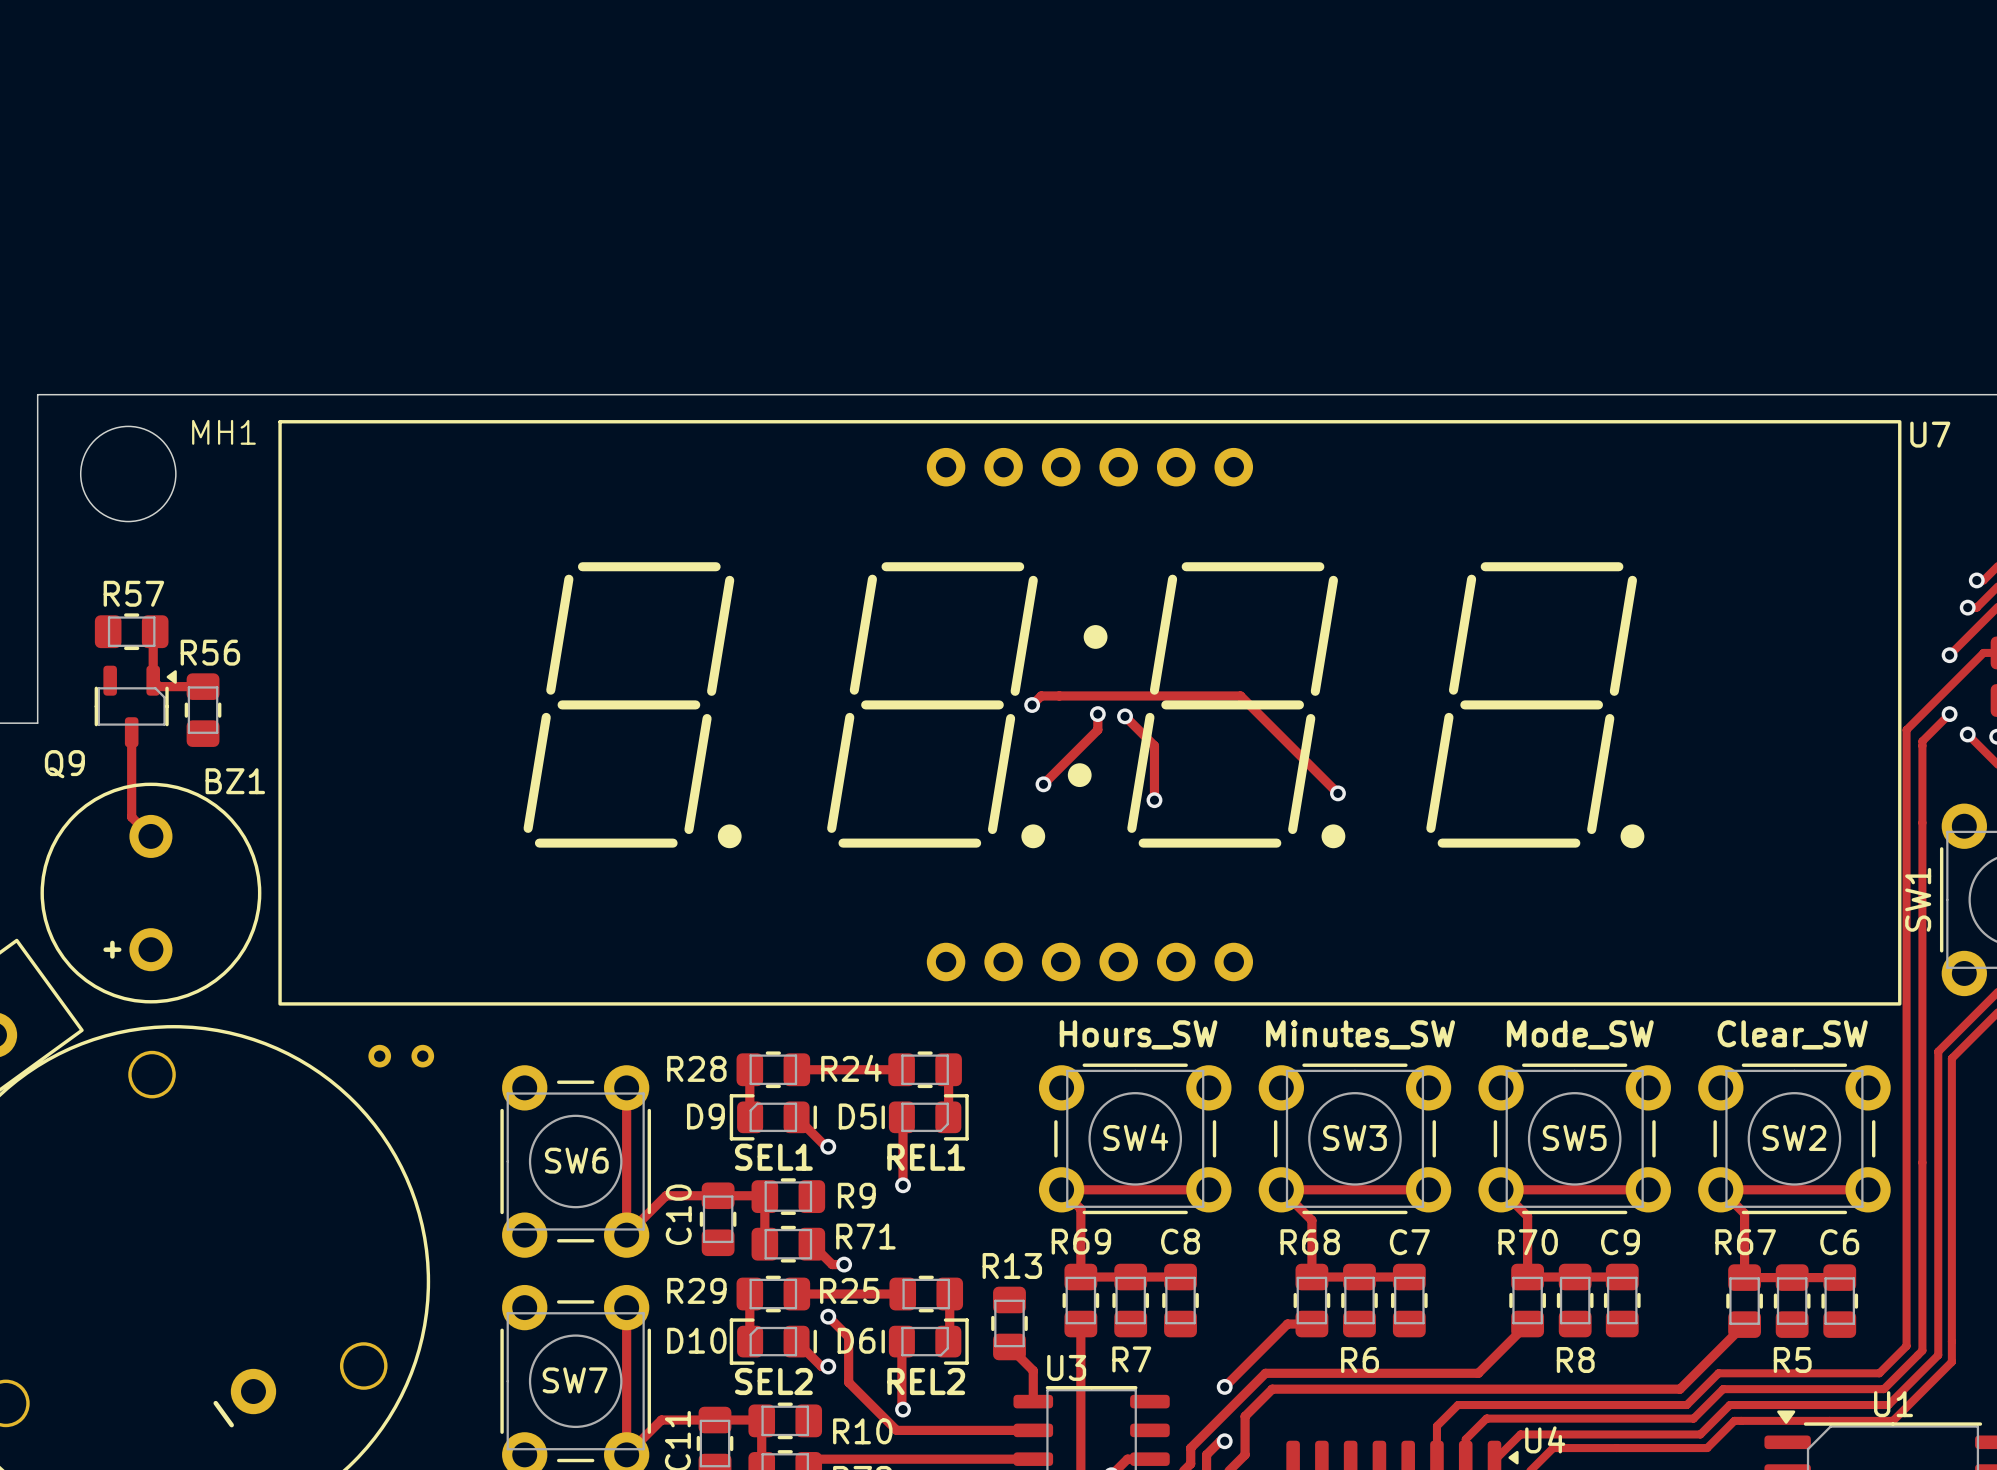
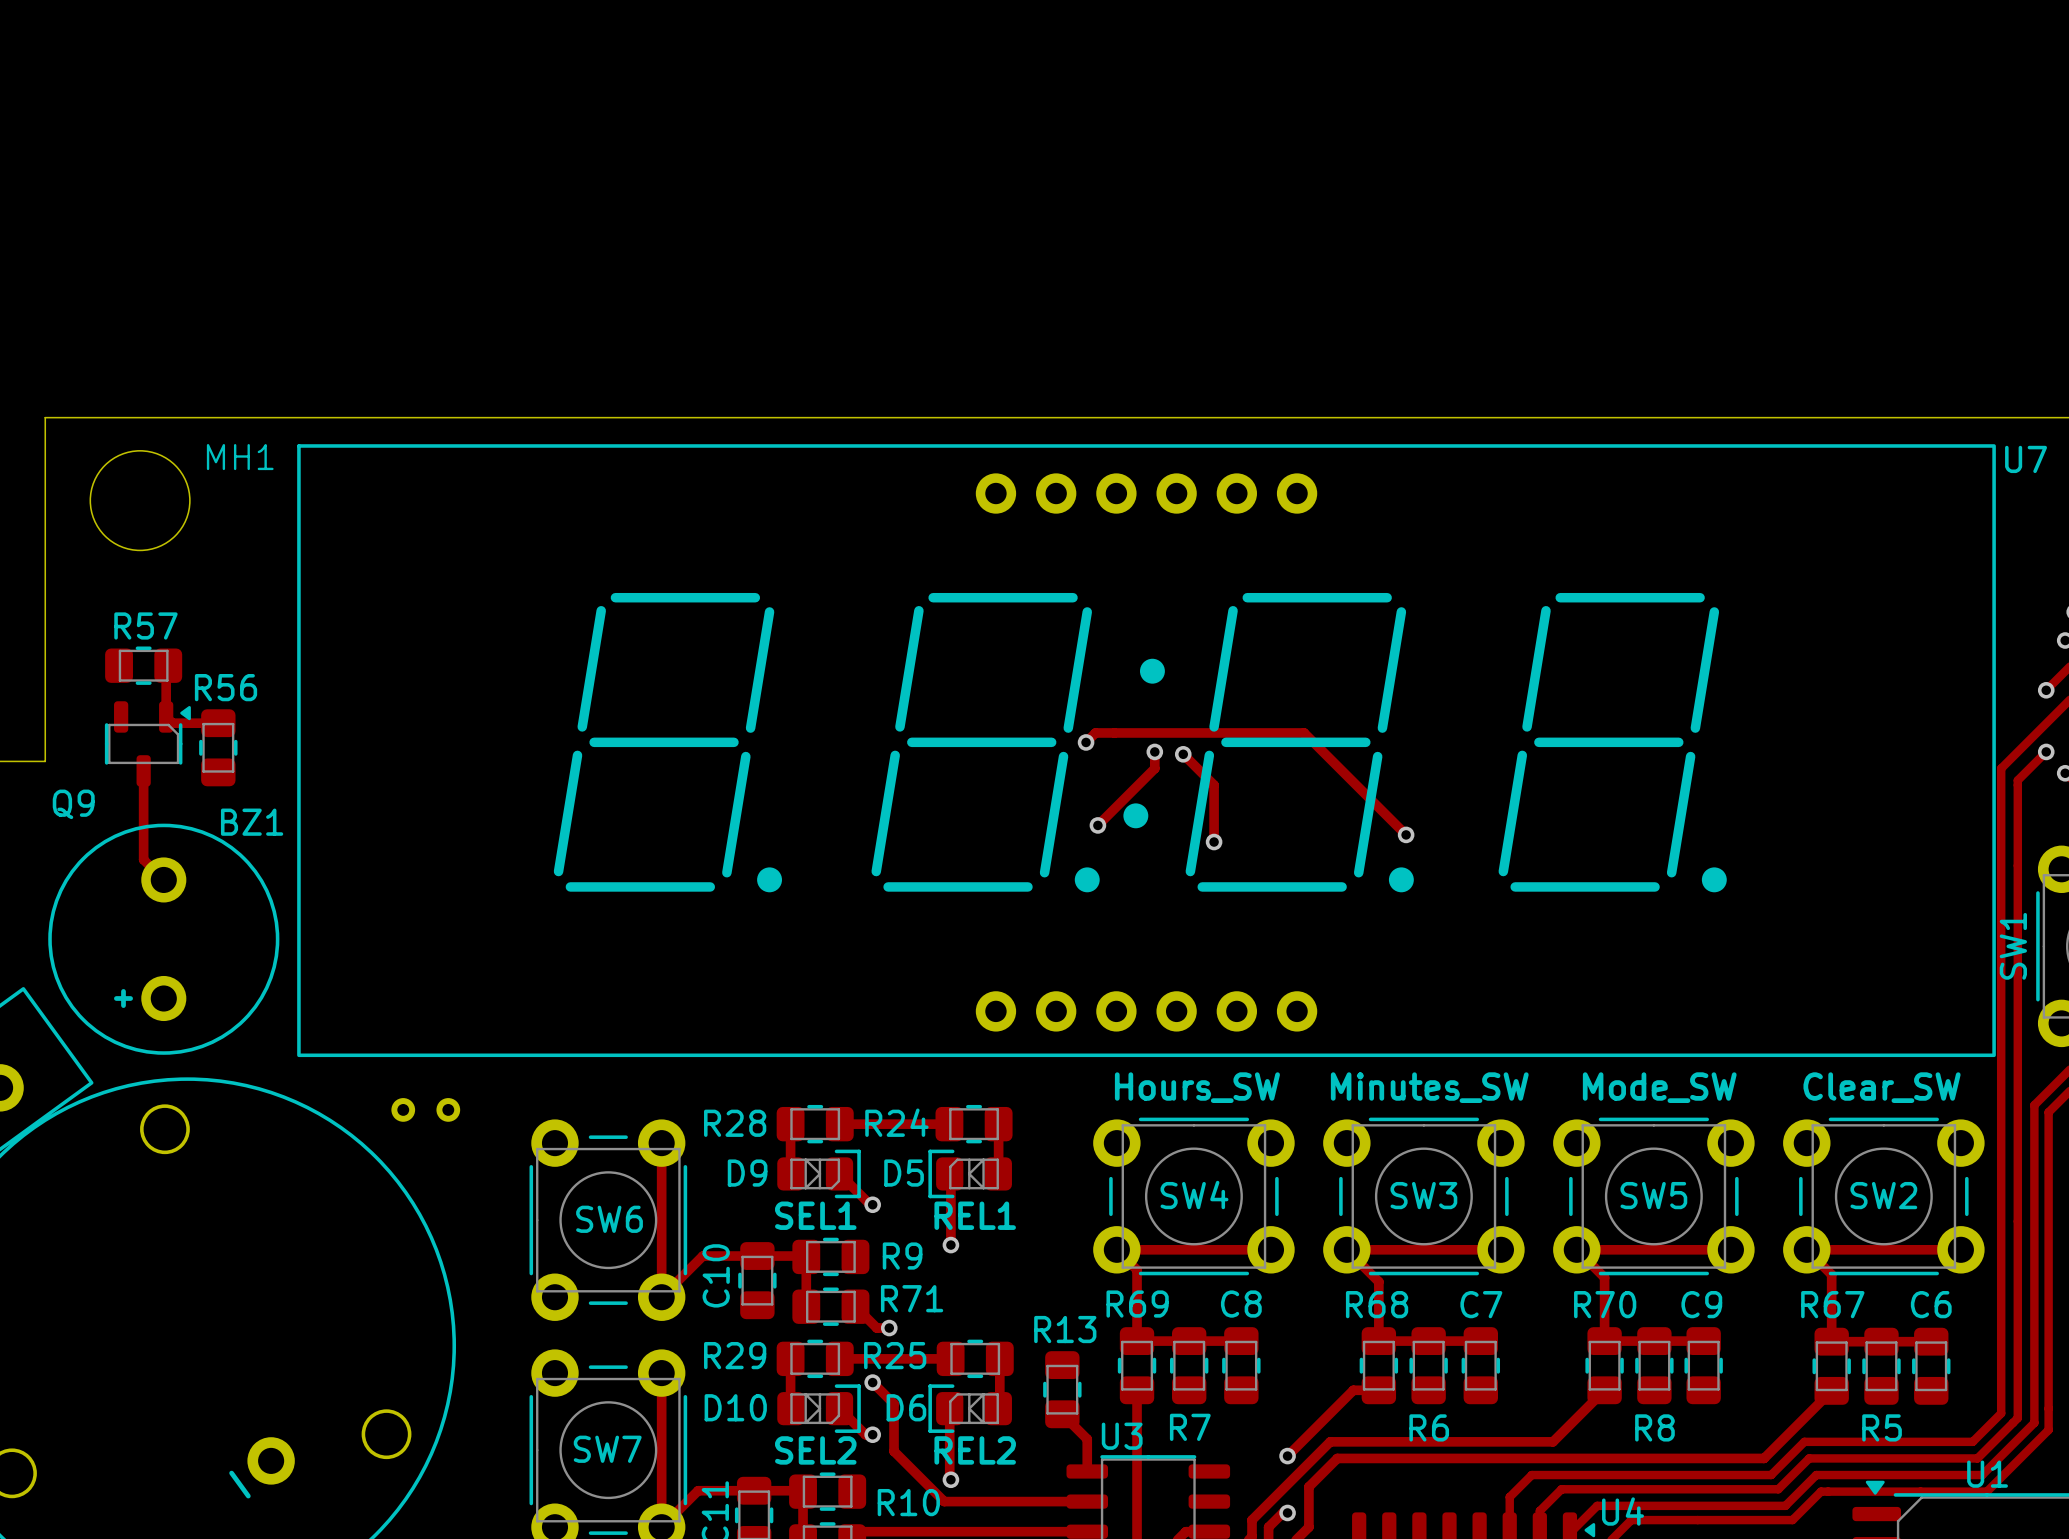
D9 footprint: [729, 1094, 817, 1141] -> [777, 1149, 861, 1199]
D5 footprint: [881, 1094, 969, 1141] -> [928, 1149, 1012, 1199]
D10 footprint: [729, 1318, 817, 1365] -> [777, 1384, 861, 1433]
D6 footprint: [881, 1318, 969, 1365] -> [928, 1384, 1012, 1433]

